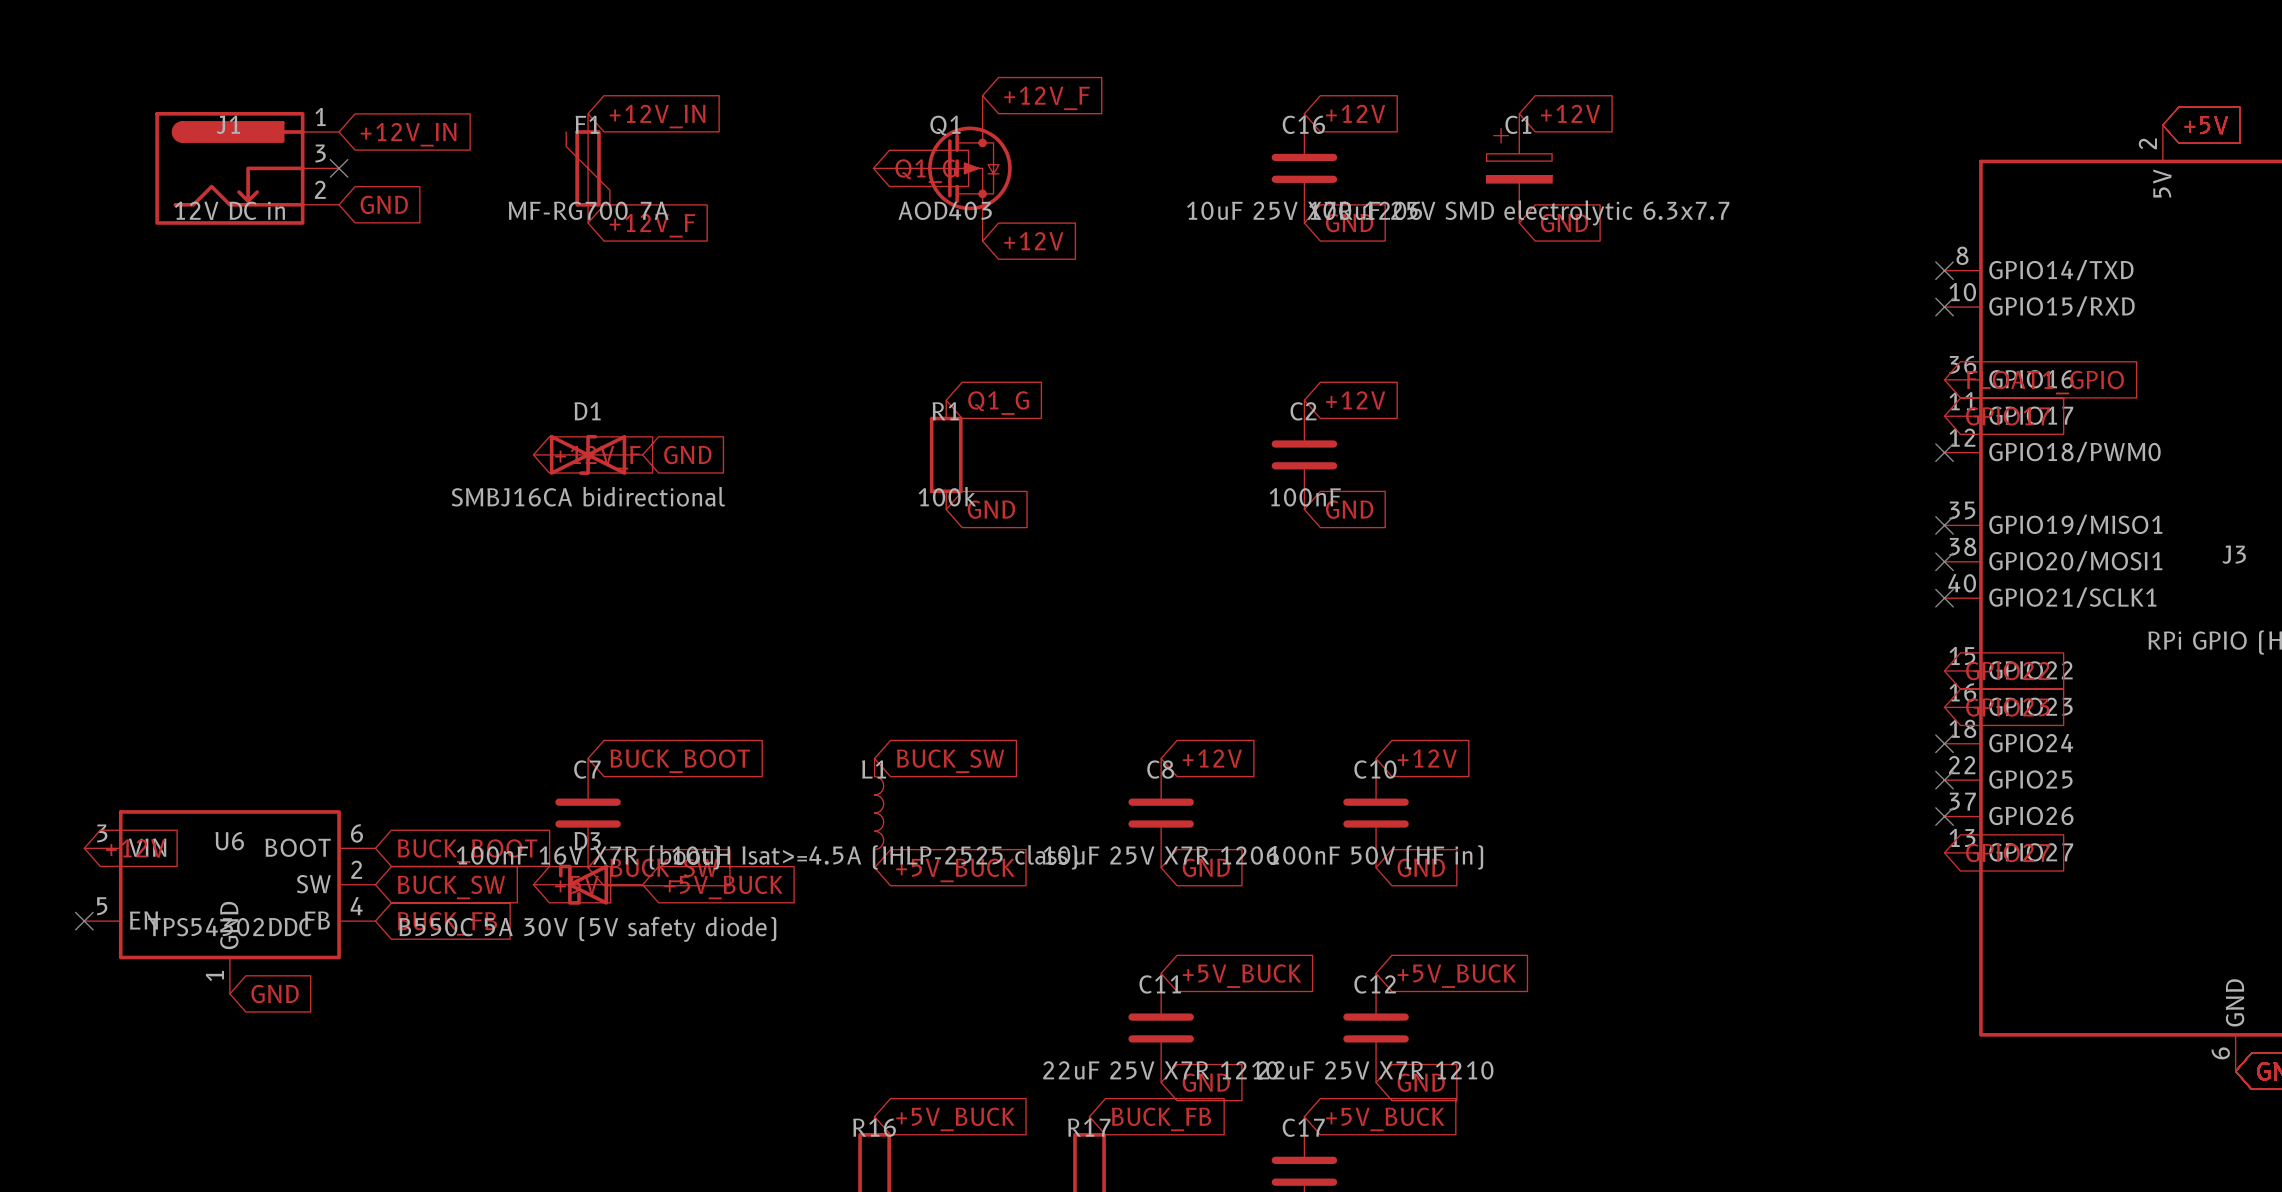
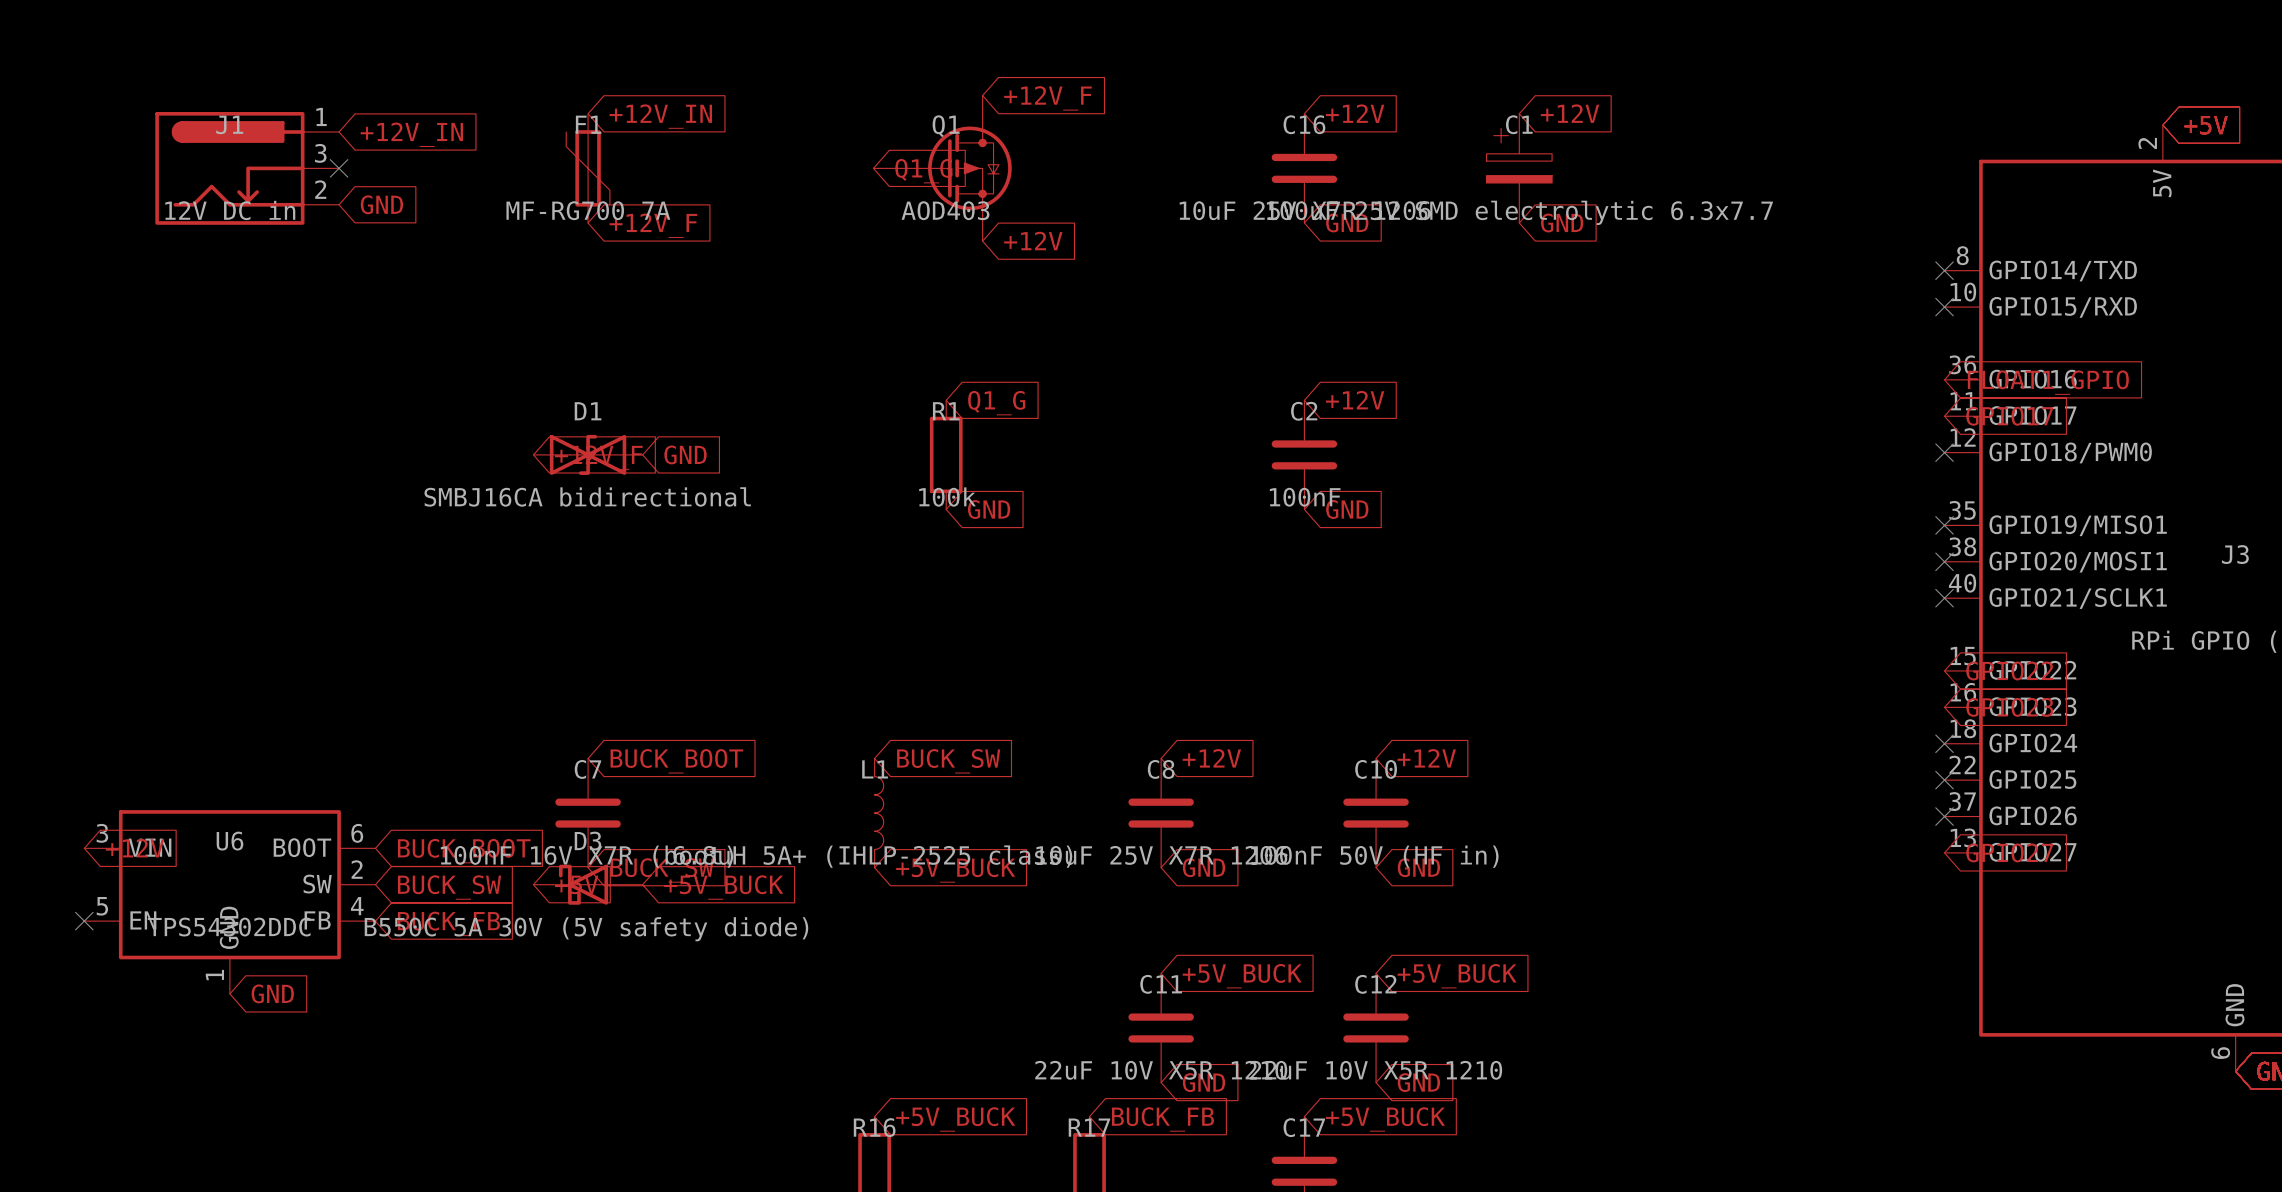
L1 value: 10uH Isat>=4.5A (IHLP-2525 class) (874, 857) -> 6.8uH 5A+ (IHLP-2525 class) (872, 856)
C11 value: 22uF 25V X7R 1210 (1160, 1070) -> 22uF 10V X5R 1210 (1161, 1070)
C12 value: 22uF 25V X7R 1210 (1375, 1070) -> 22uF 10V X5R 1210 (1376, 1070)

